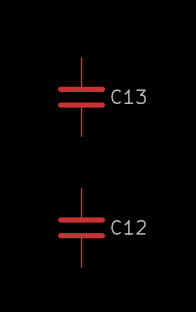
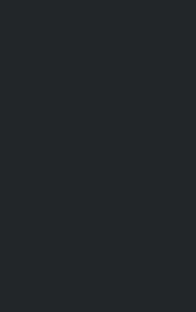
C13: (81, 97) -> none
C12: (81, 227) -> none

